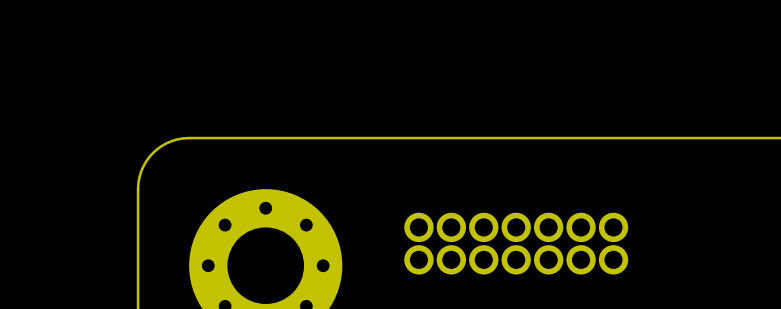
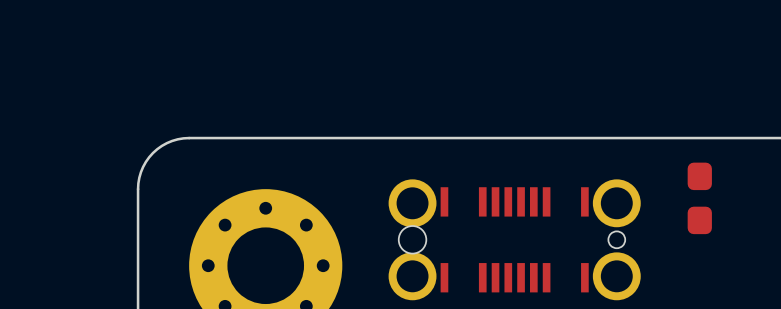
part: none -> (699, 198)
part footprint: [404, 212, 629, 275] -> [388, 179, 641, 301]

